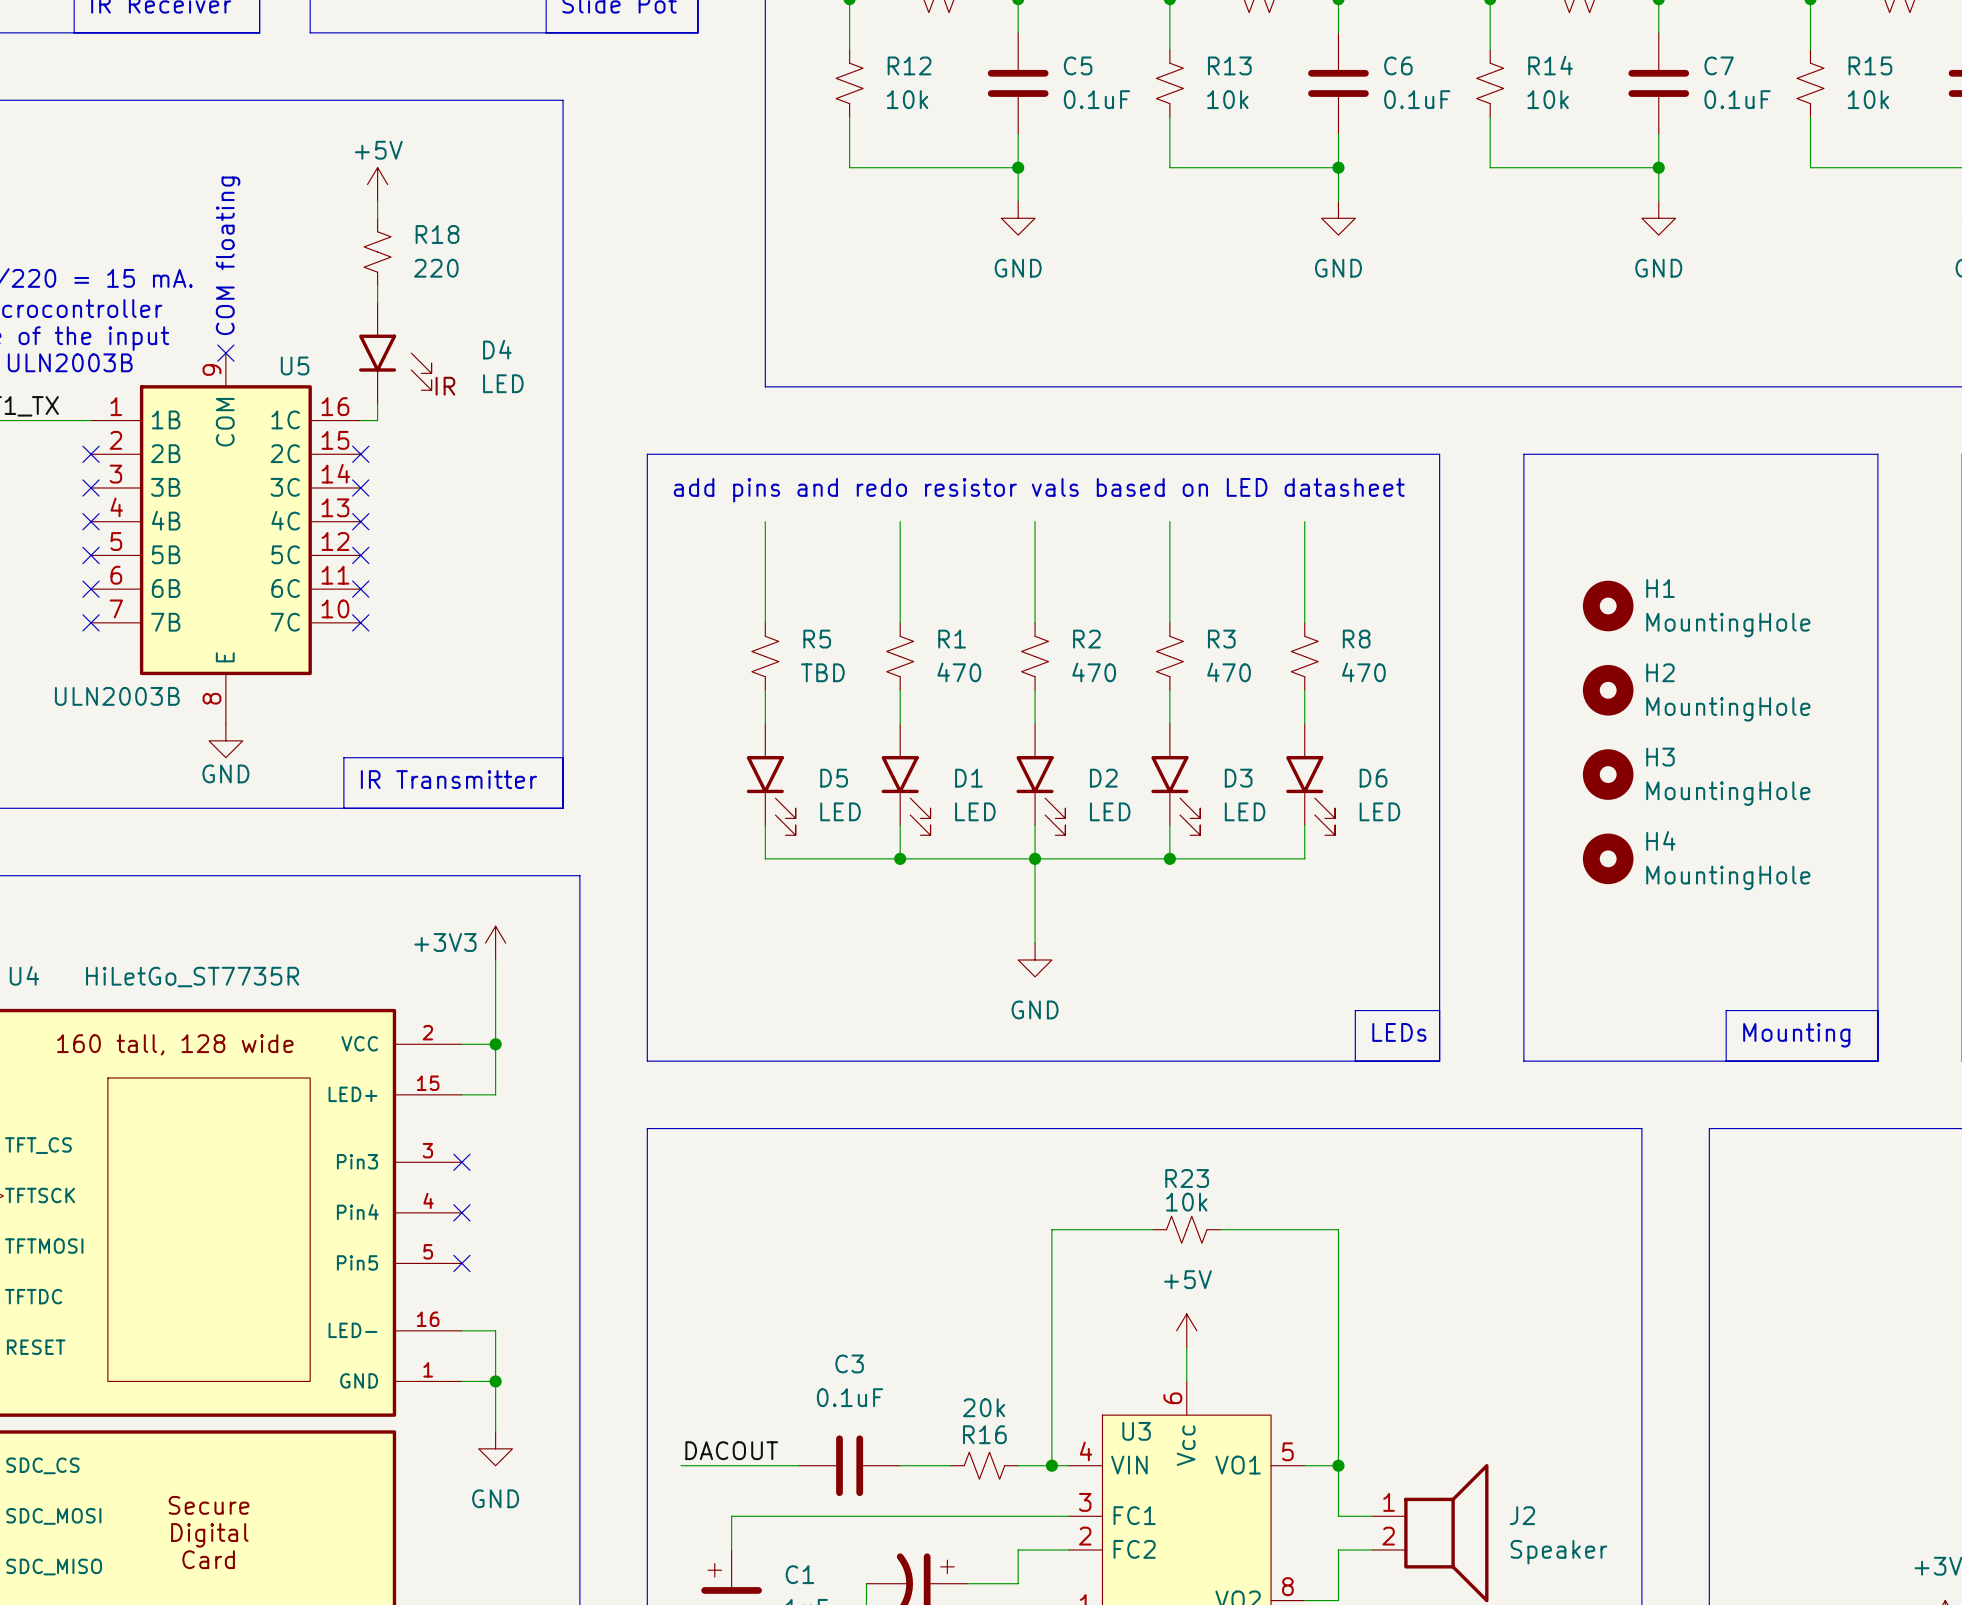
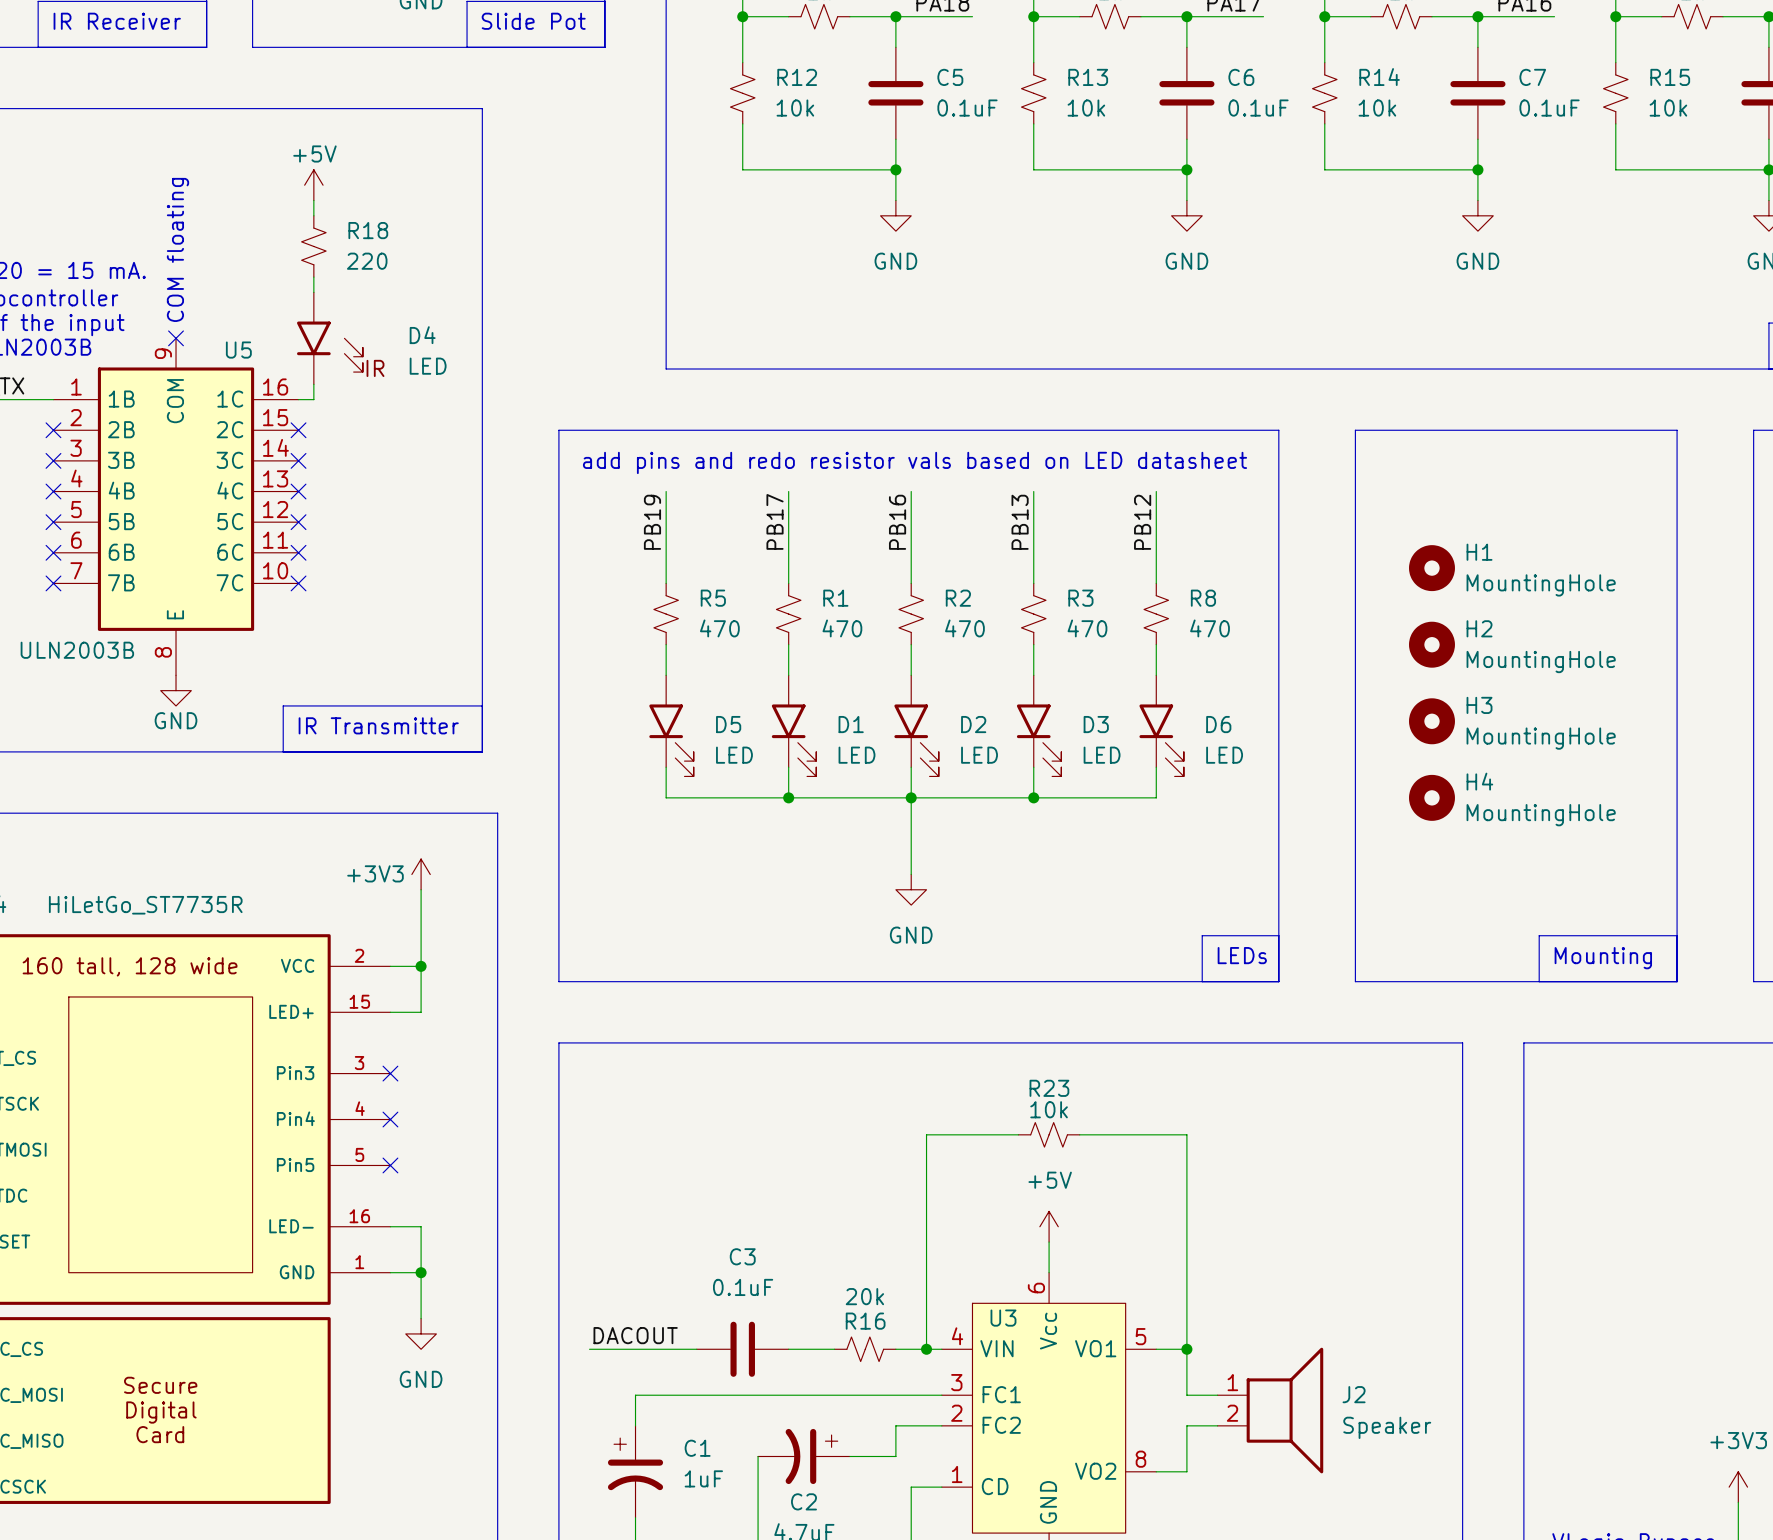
label: none -> PB19 (652, 522)
label: none -> PB17 (775, 521)
label: none -> PB16 (897, 522)
label: none -> PB13 (1020, 522)
label: none -> PB12 (1142, 522)
R5 value: TBD (822, 672) -> 470 (719, 628)

